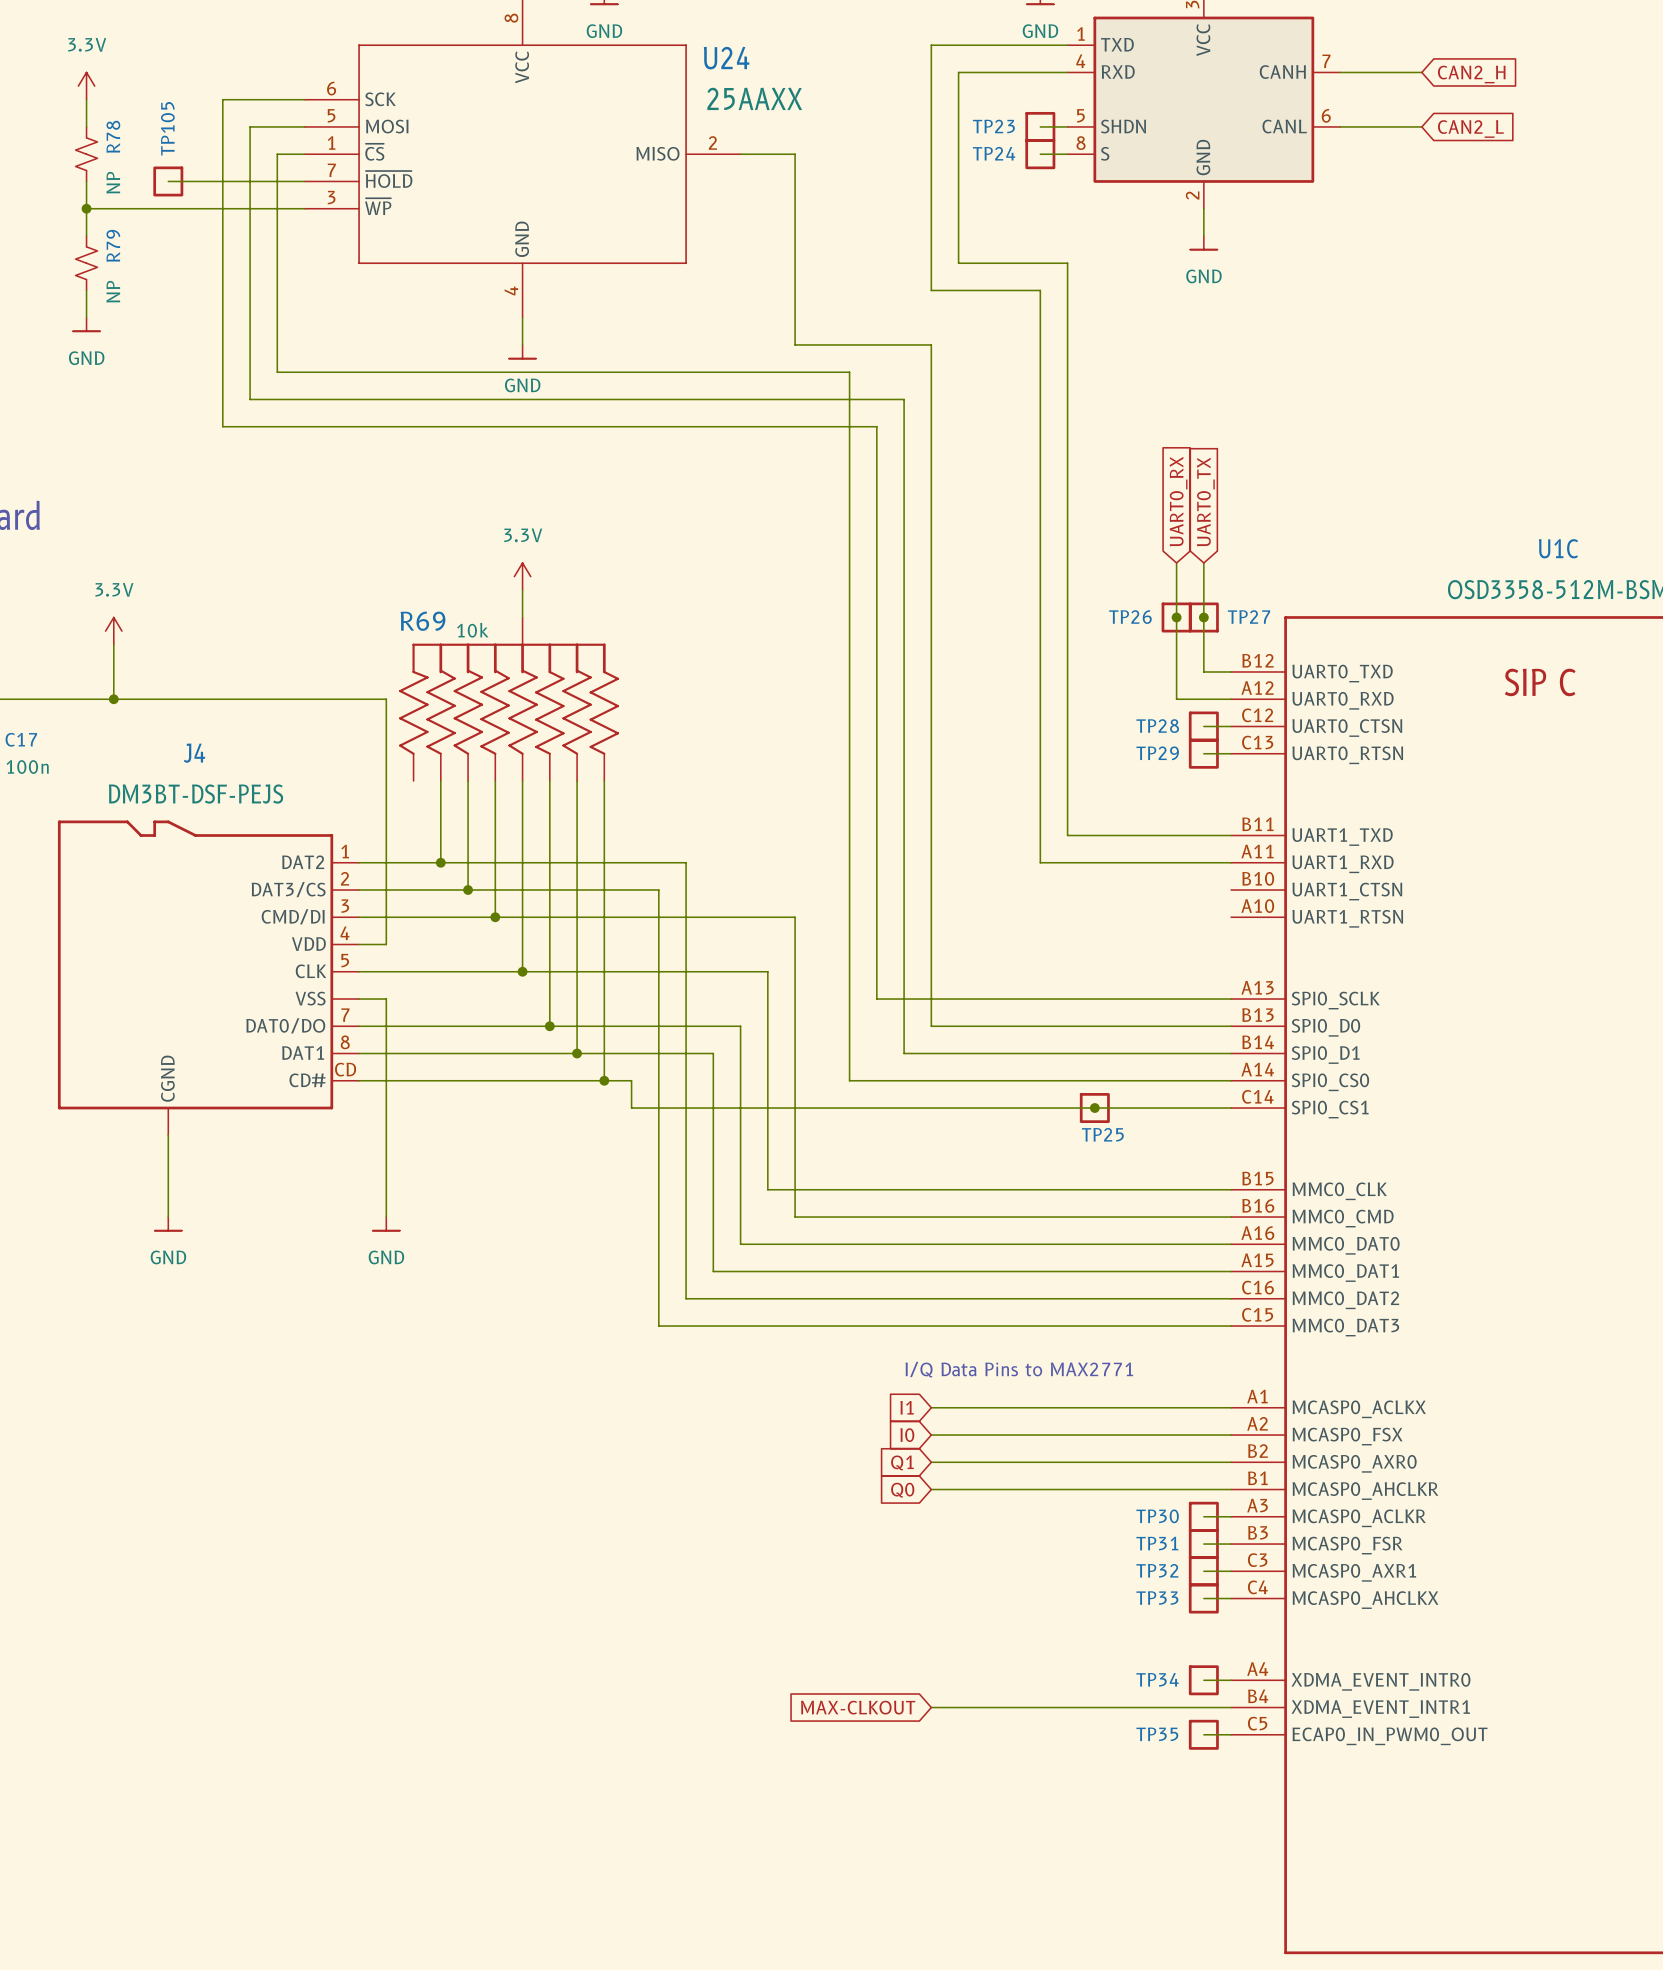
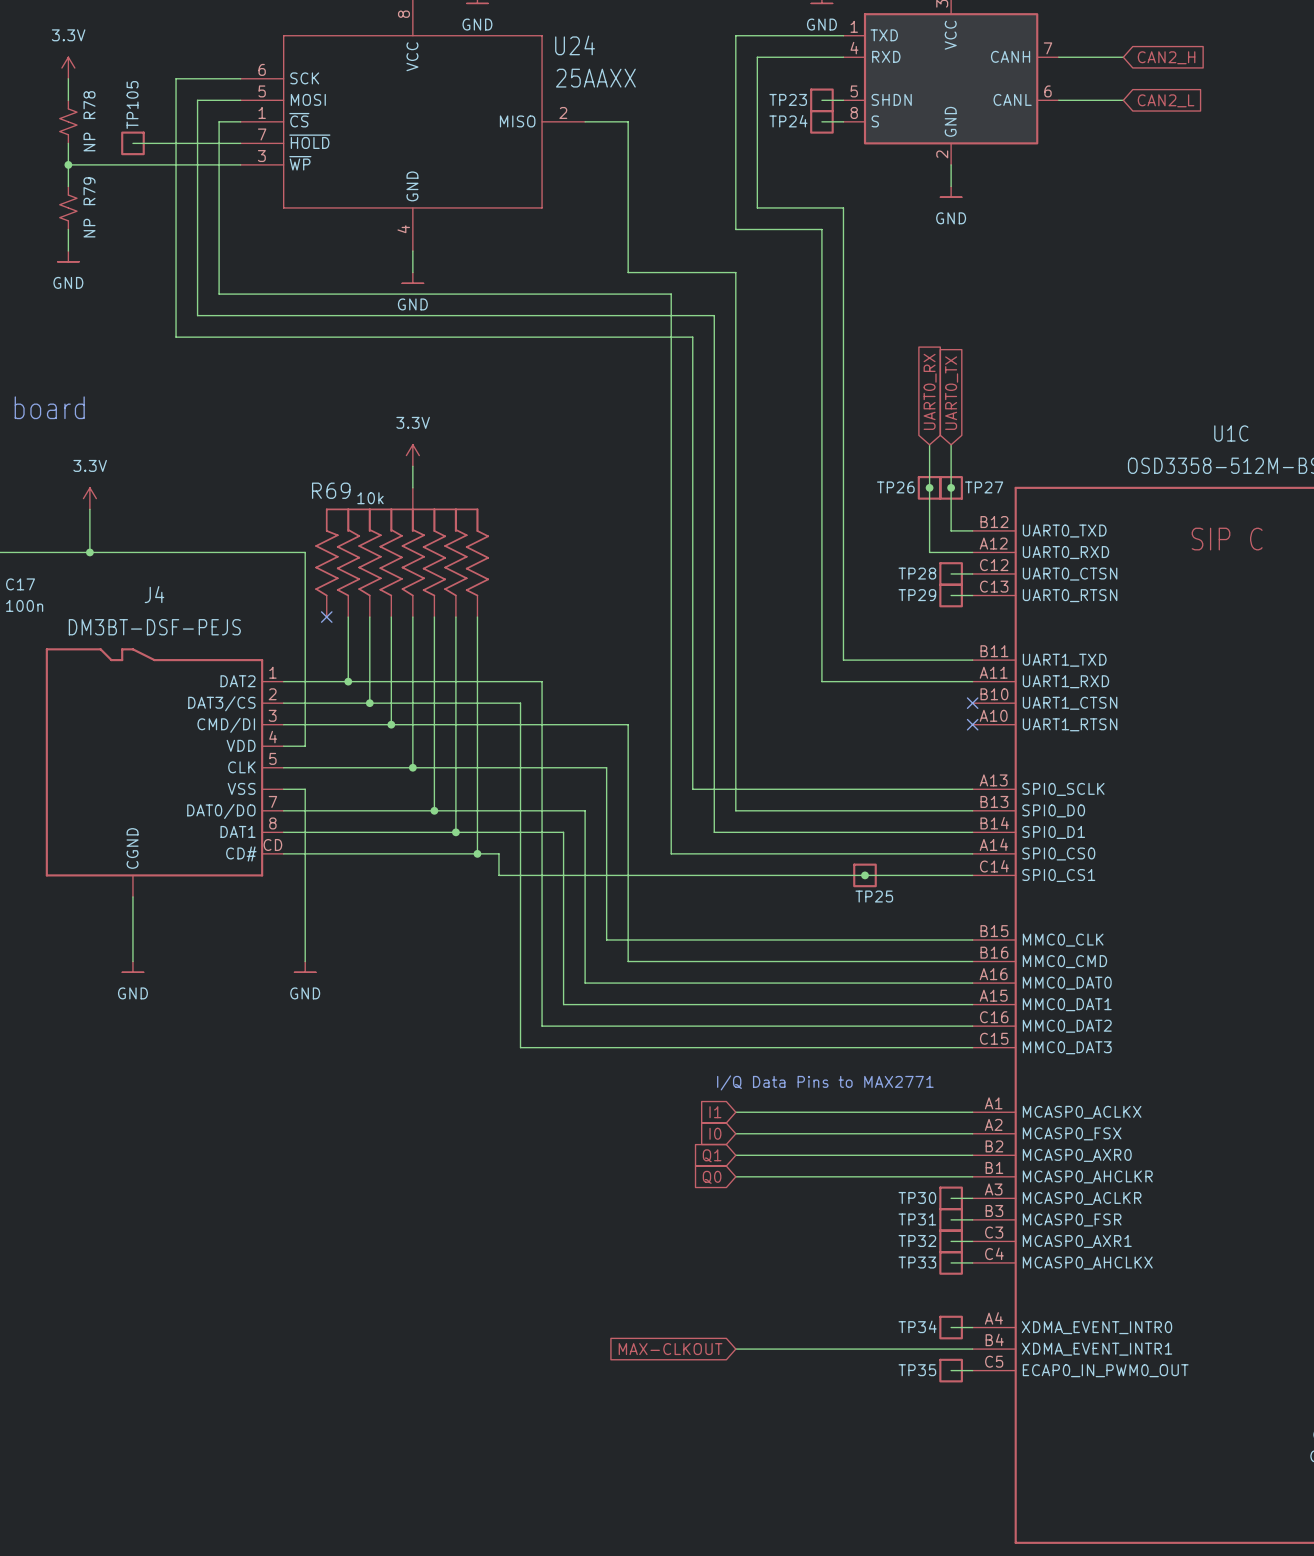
no-connect mark: none -> (326, 617)
no-connect mark: none -> (972, 703)
no-connect mark: none -> (972, 724)

